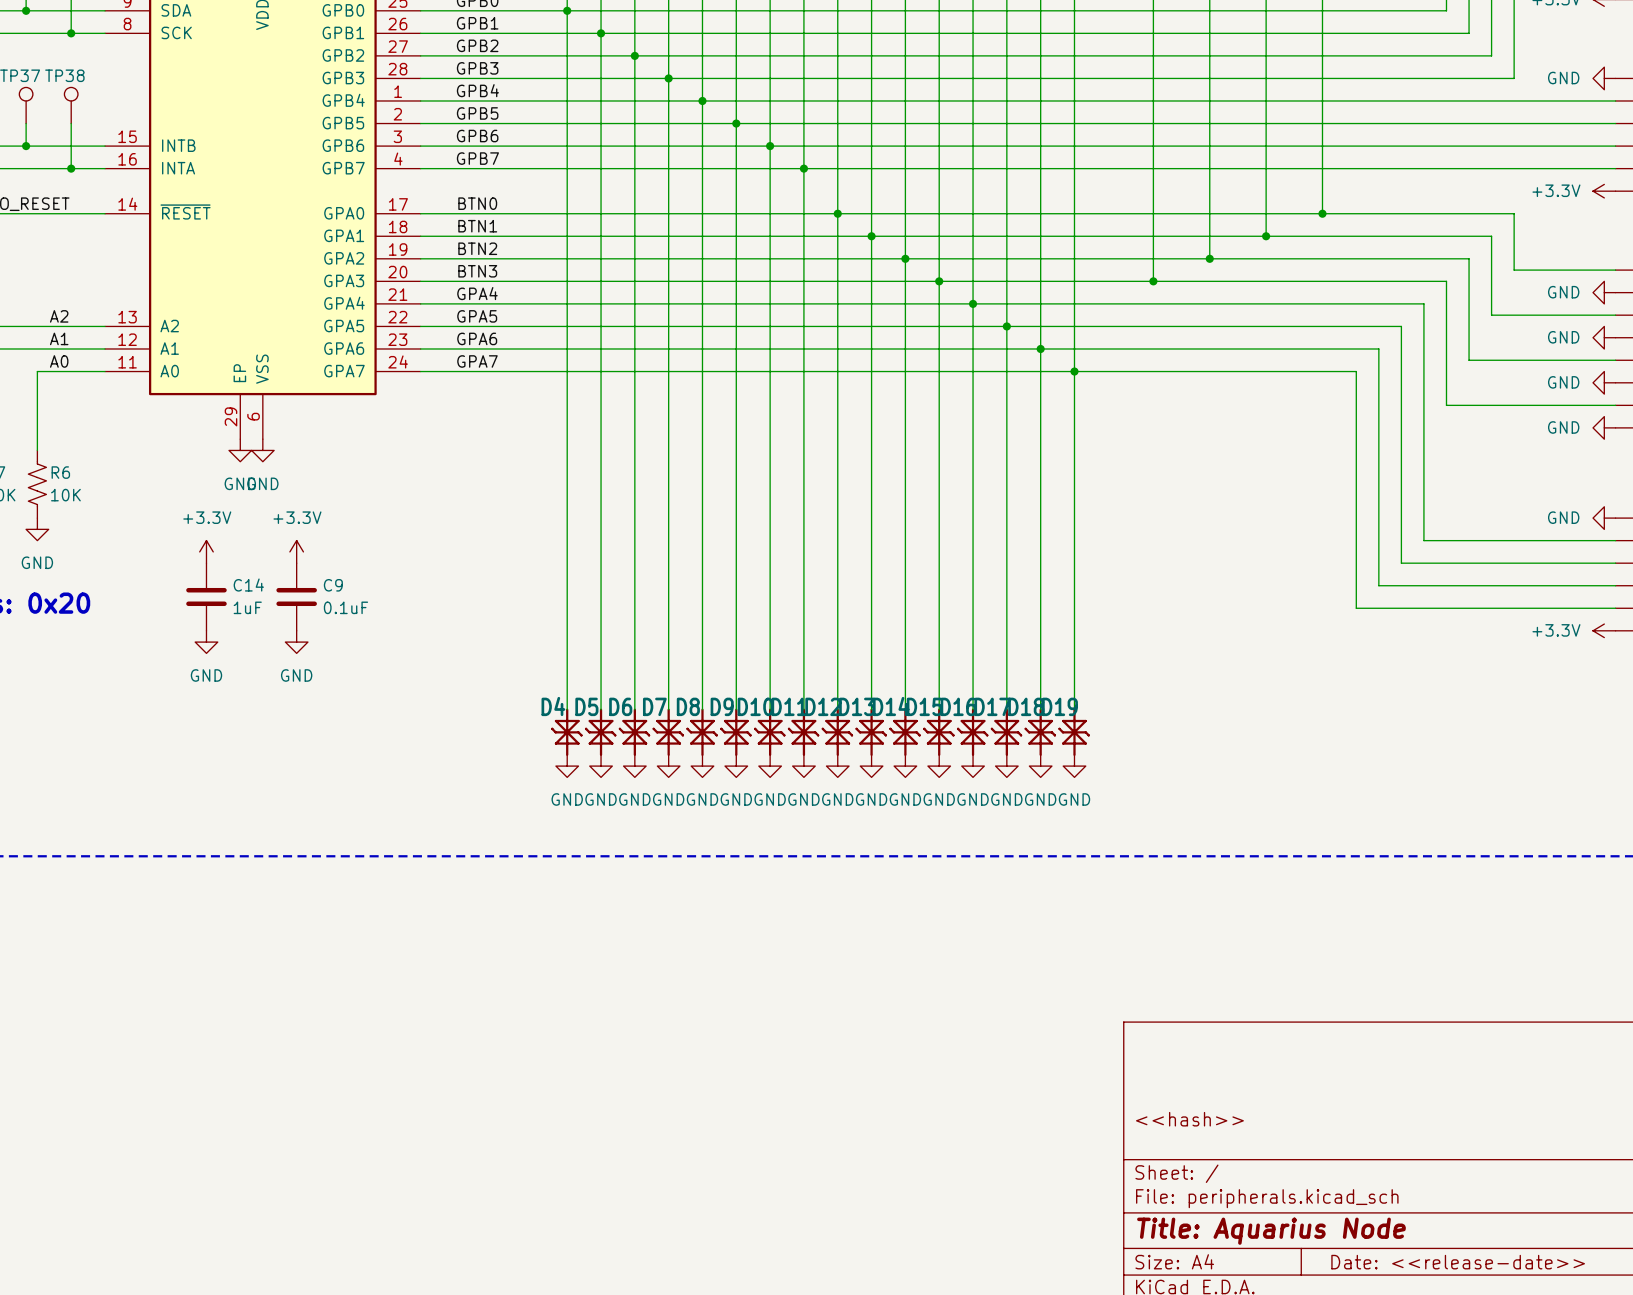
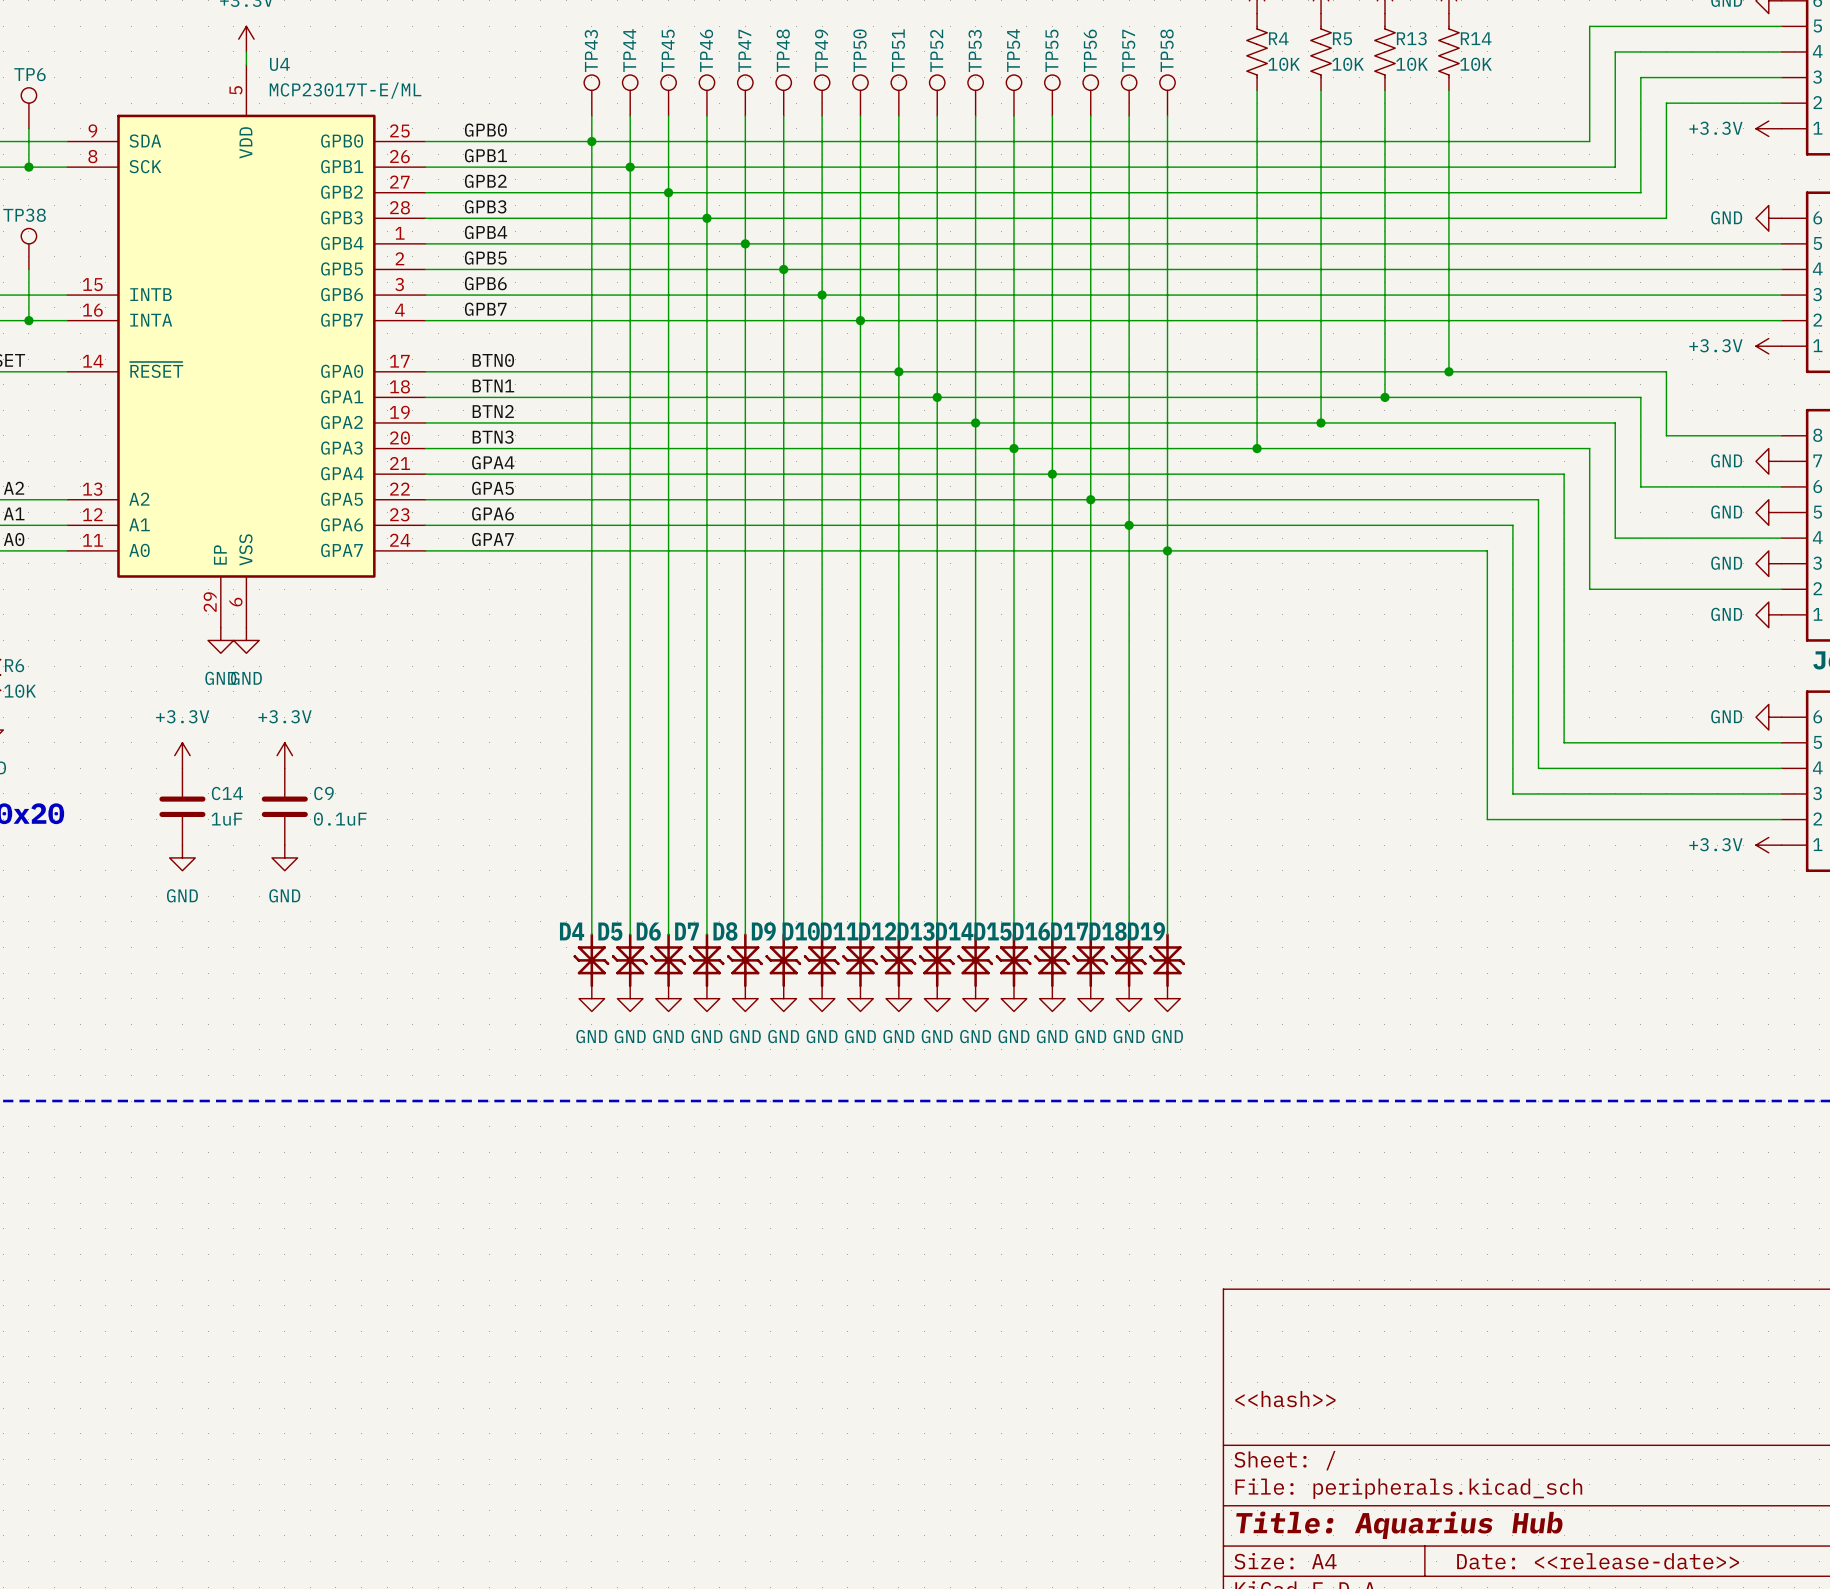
title block: Title: Aquarius Node (1271, 1231) -> Title: Aquarius Hub (1399, 1525)

